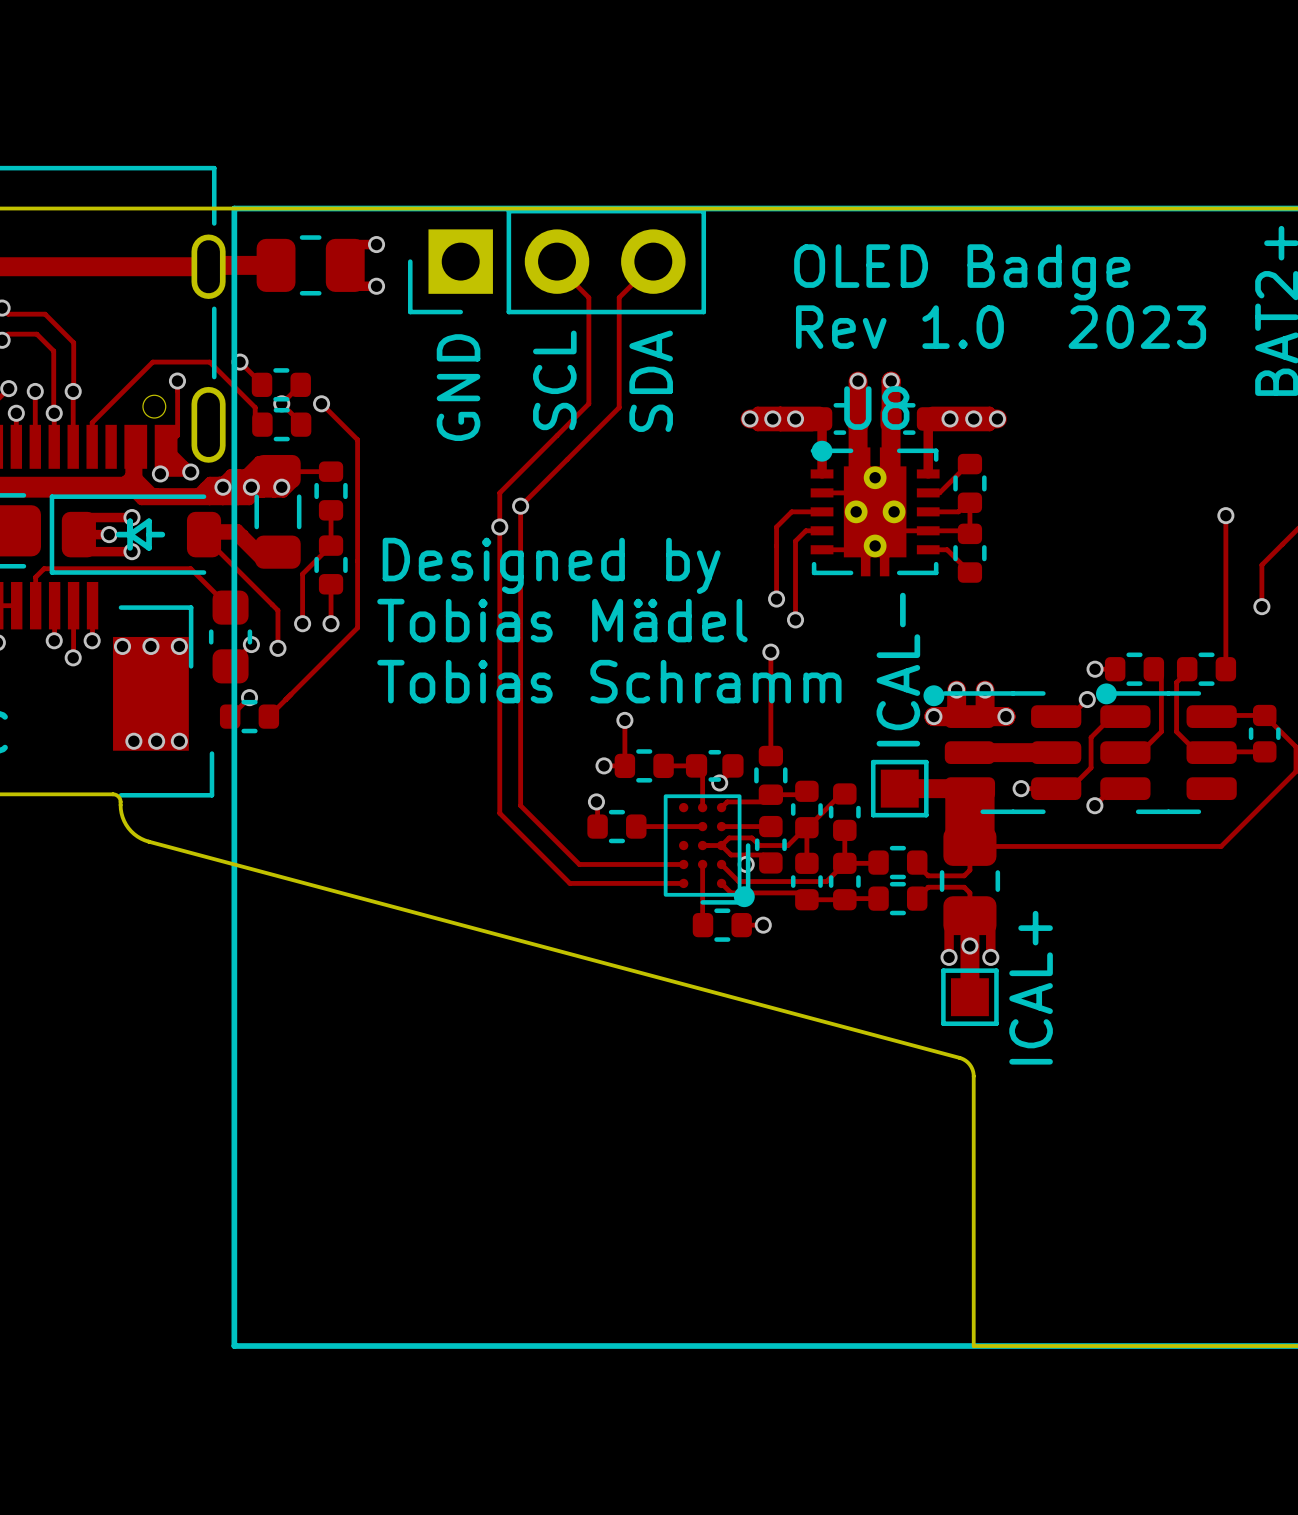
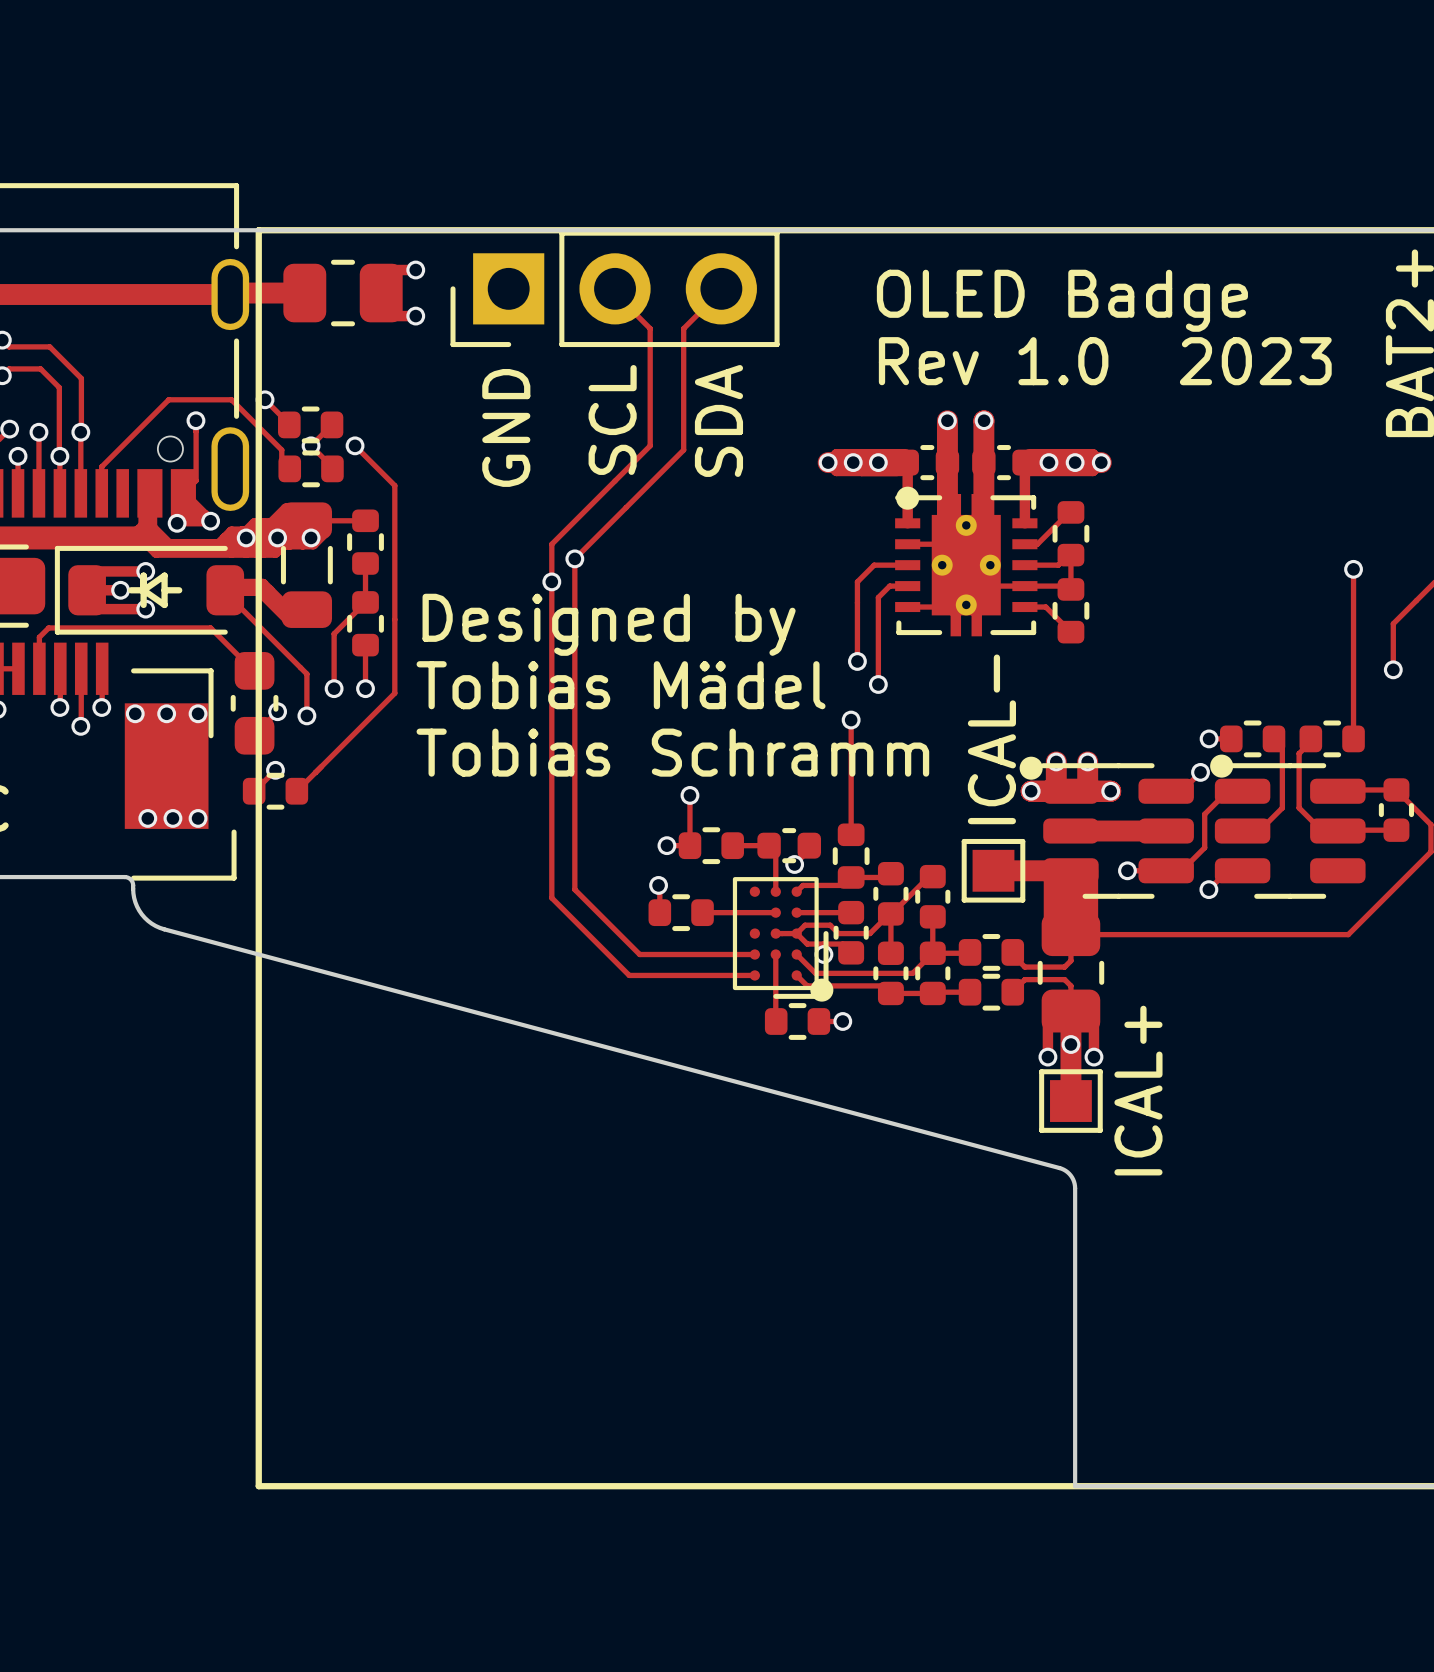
U8: (875, 511) -> none
part: none -> (966, 565)

